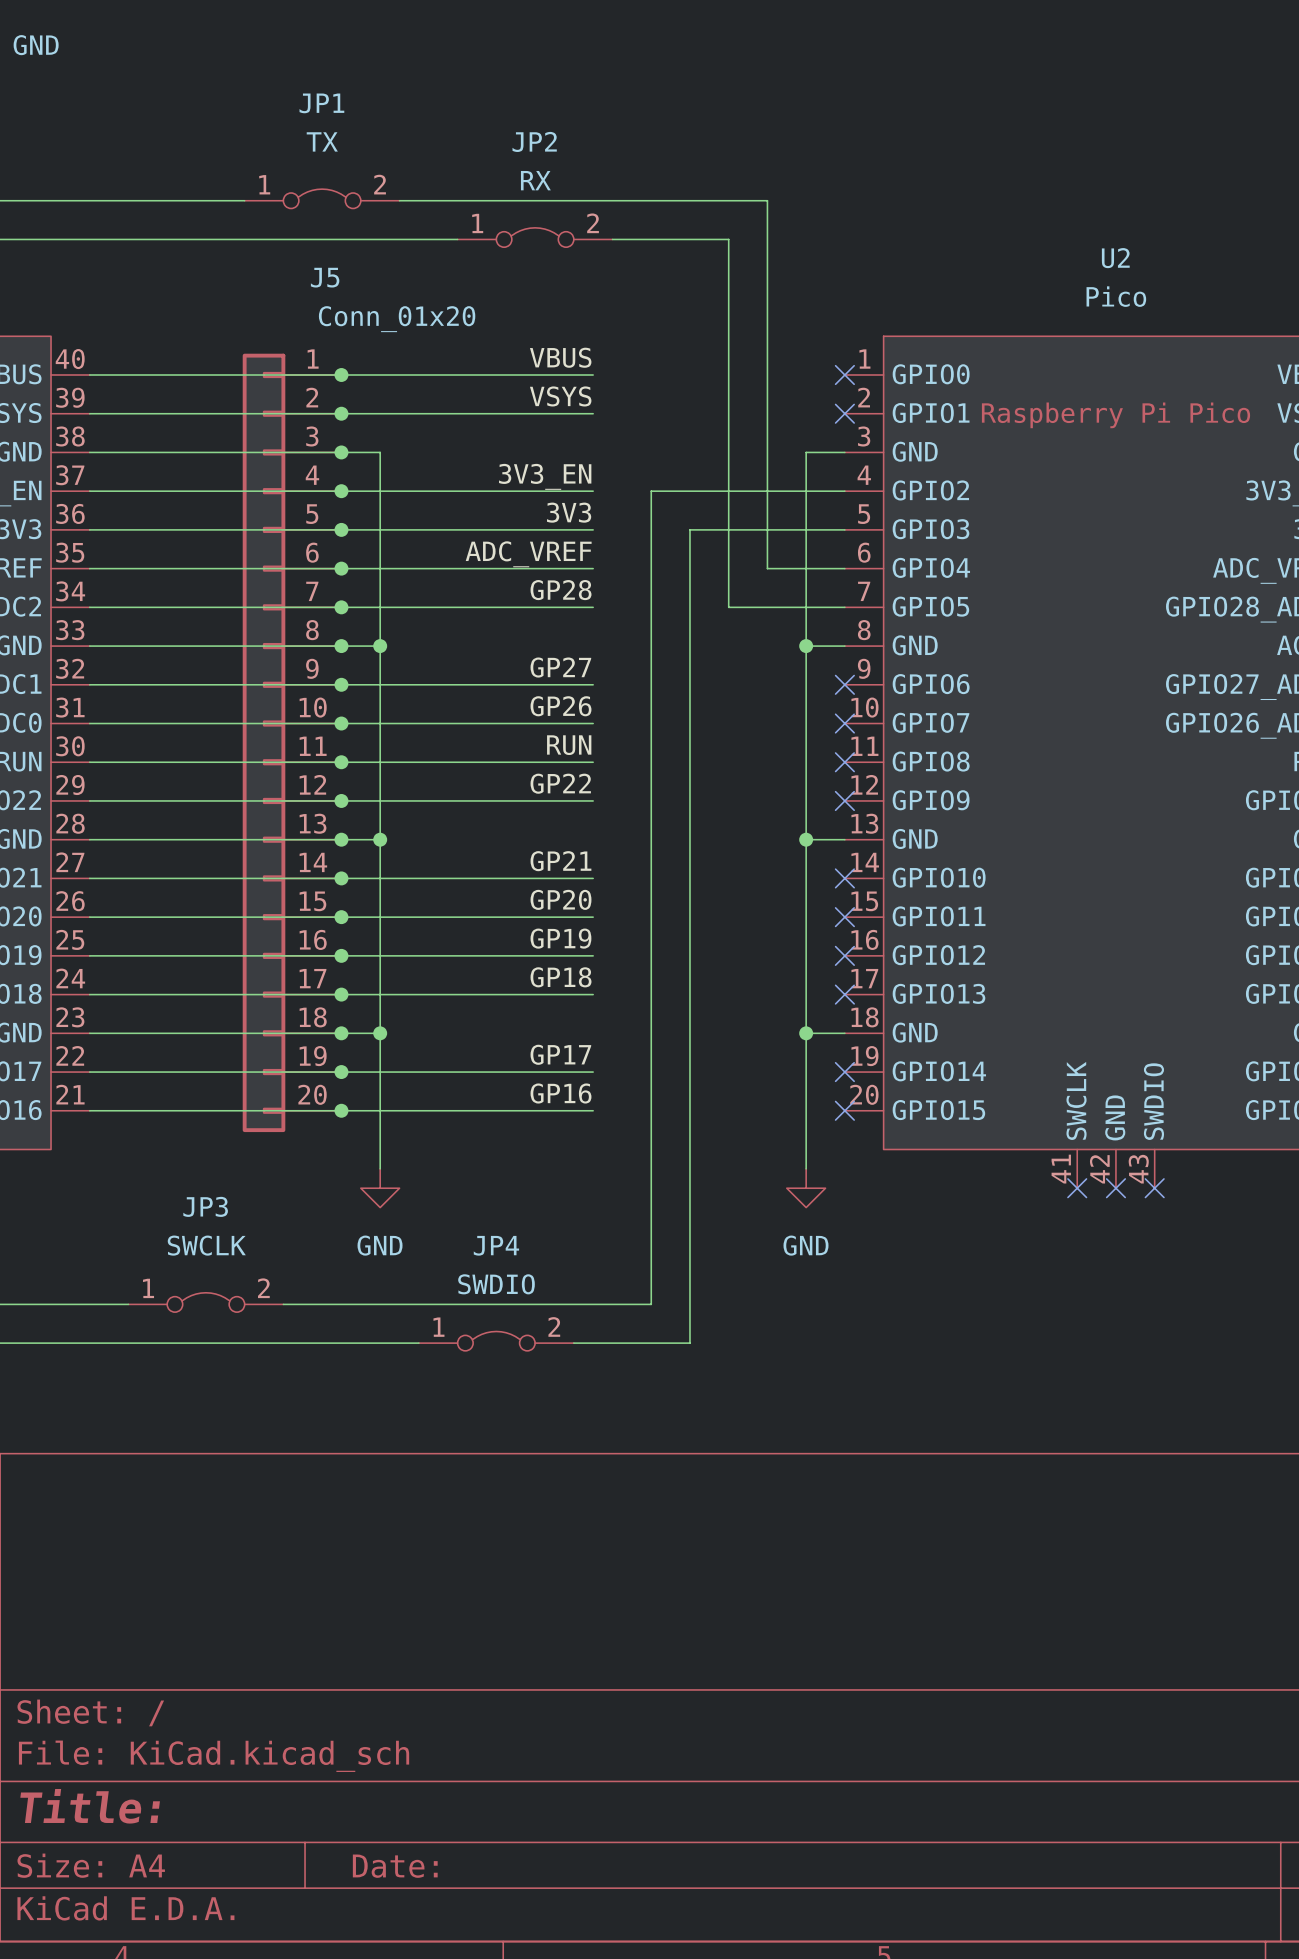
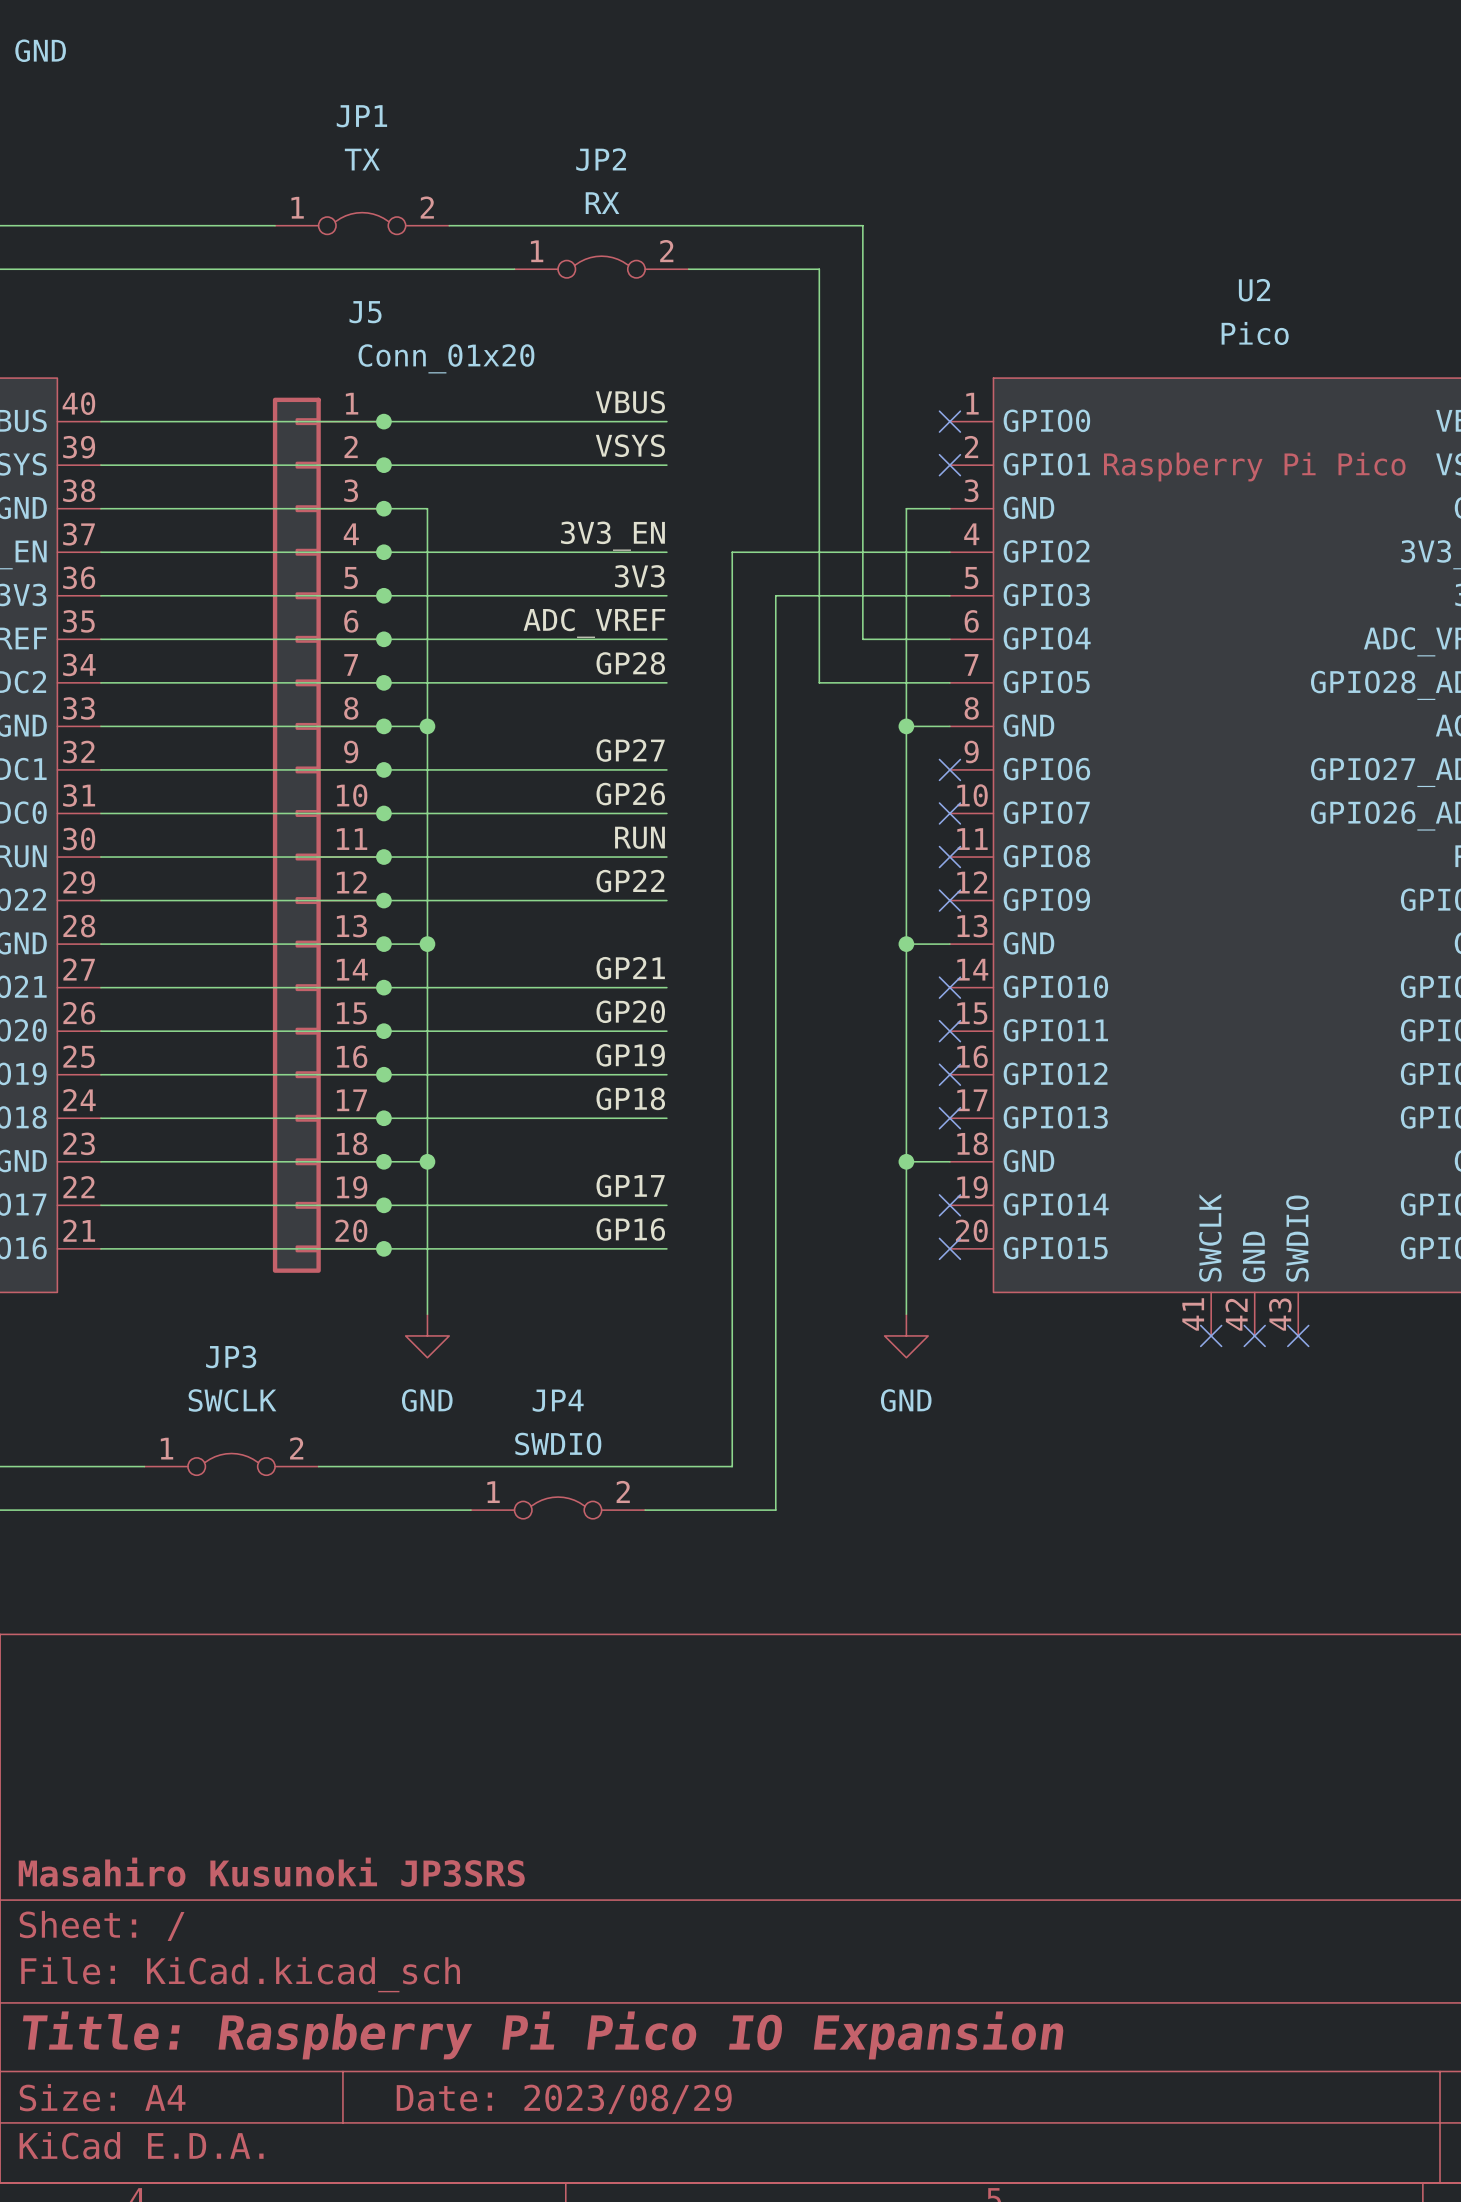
title block: none -> Masahiro Kusunoki JP3SRS (271, 1872)
title block: Title: (90, 1806) -> Title: Raspberry Pi Pico IO Expansion (543, 2035)
title block: Date: (395, 1866) -> Date: 2023/08/29 (564, 2099)

